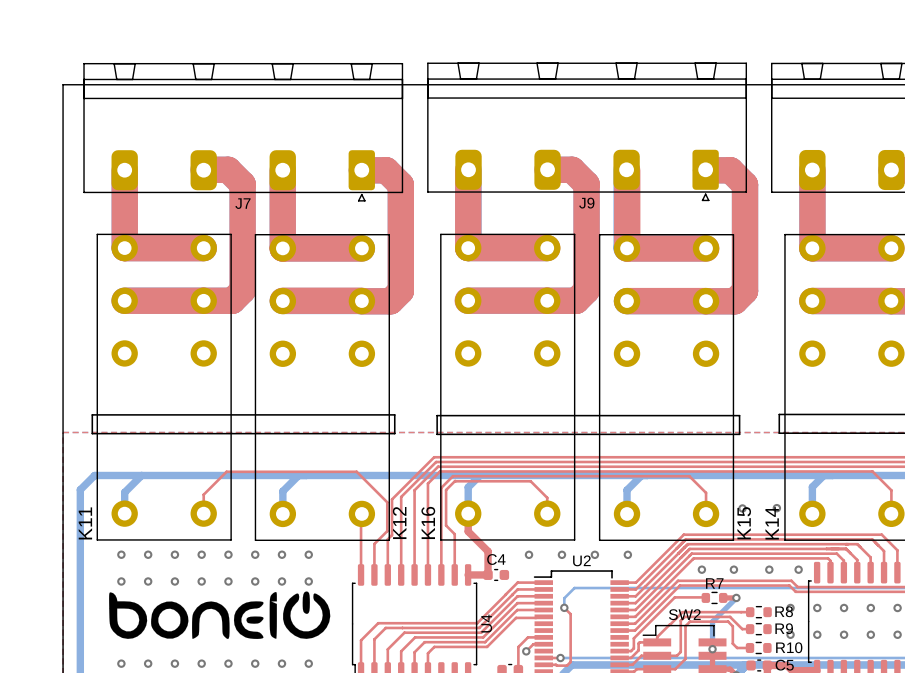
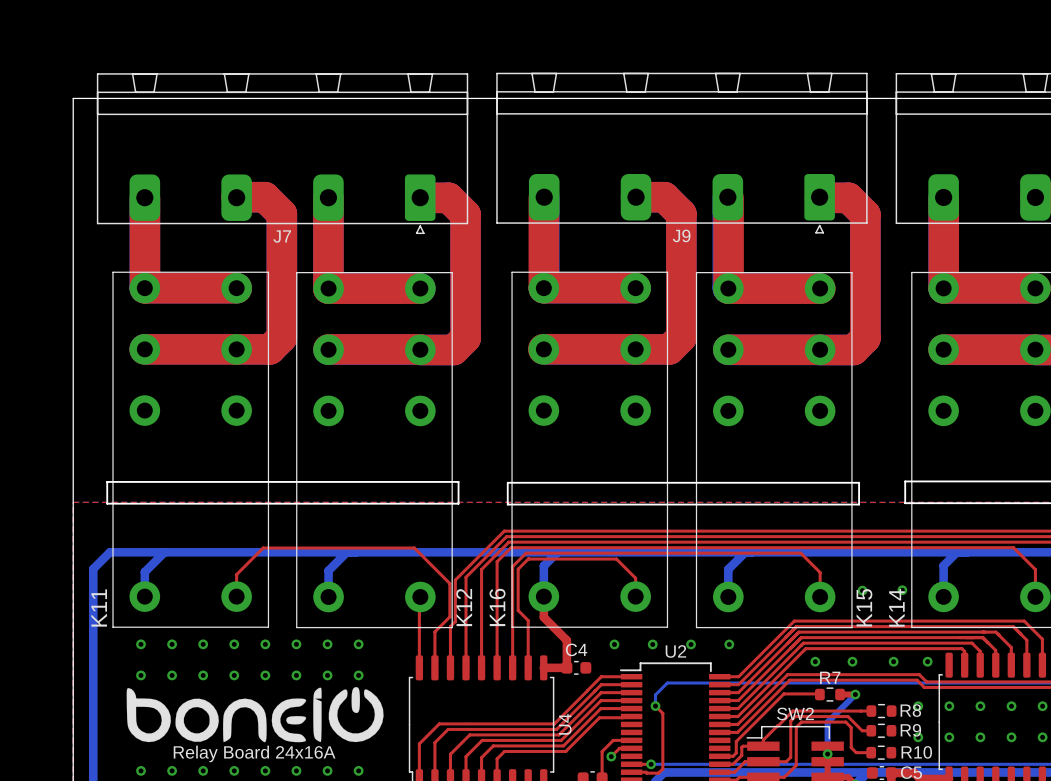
text: none -> Relay Board 24x16A (254, 753)

